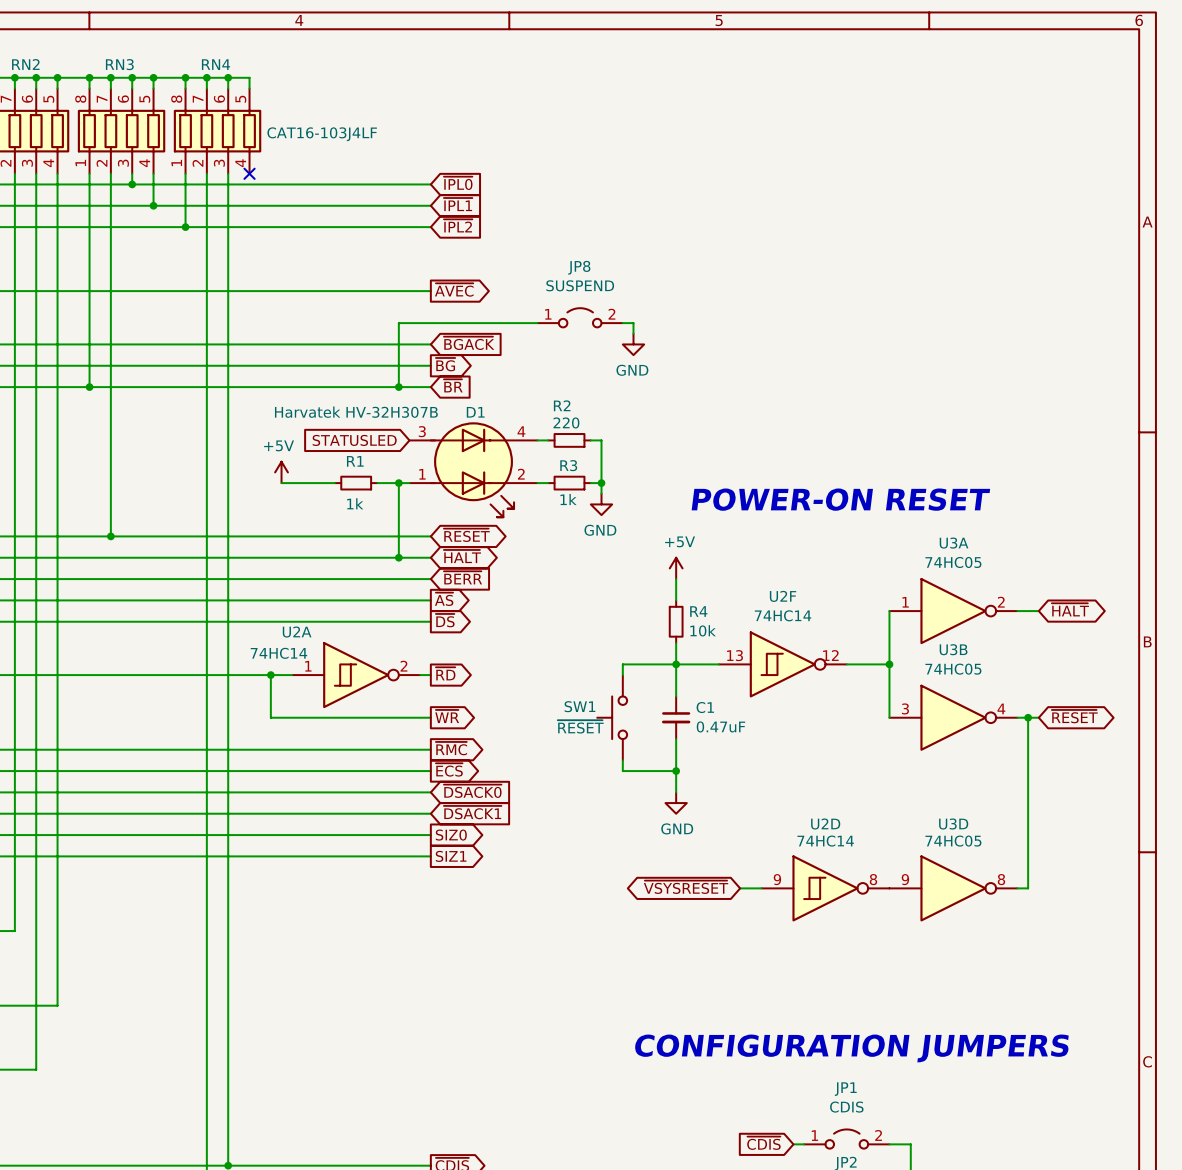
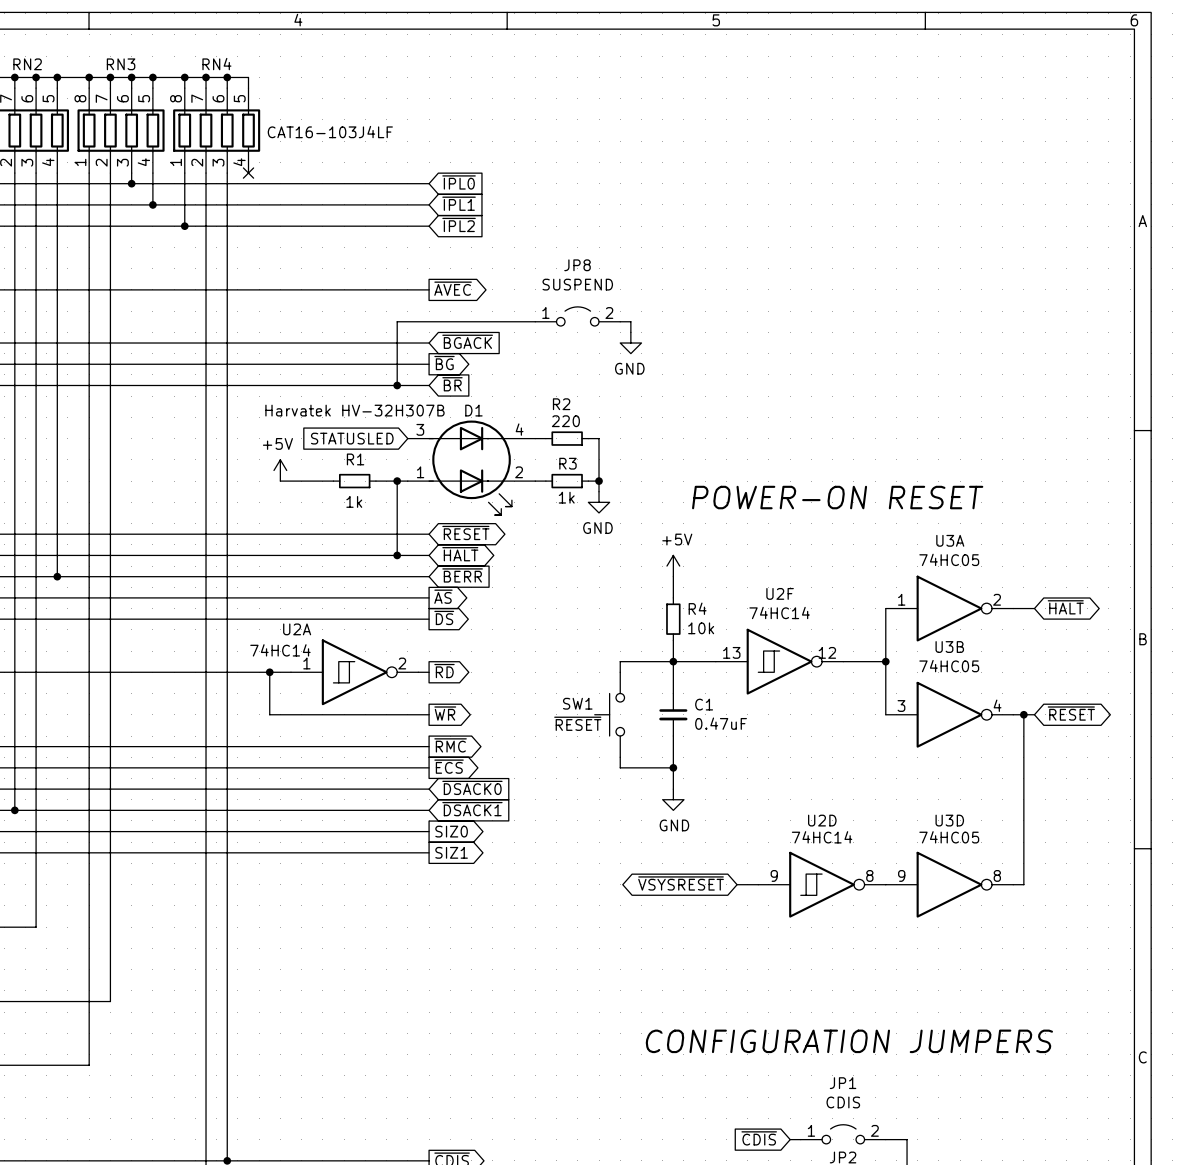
junction: (89, 387) -> none
junction: (110, 536) -> none
wire: (57, 579) (57, 1005) -> (110, 534) (110, 1001) (57, 1001)
junction: none -> (57, 576)
wire: (14, 813) (14, 931) -> (36, 927) (14, 927)
junction: none -> (14, 810)
wire: (36, 931) (36, 1069) -> (89, 385) (89, 1065) (36, 1065)

